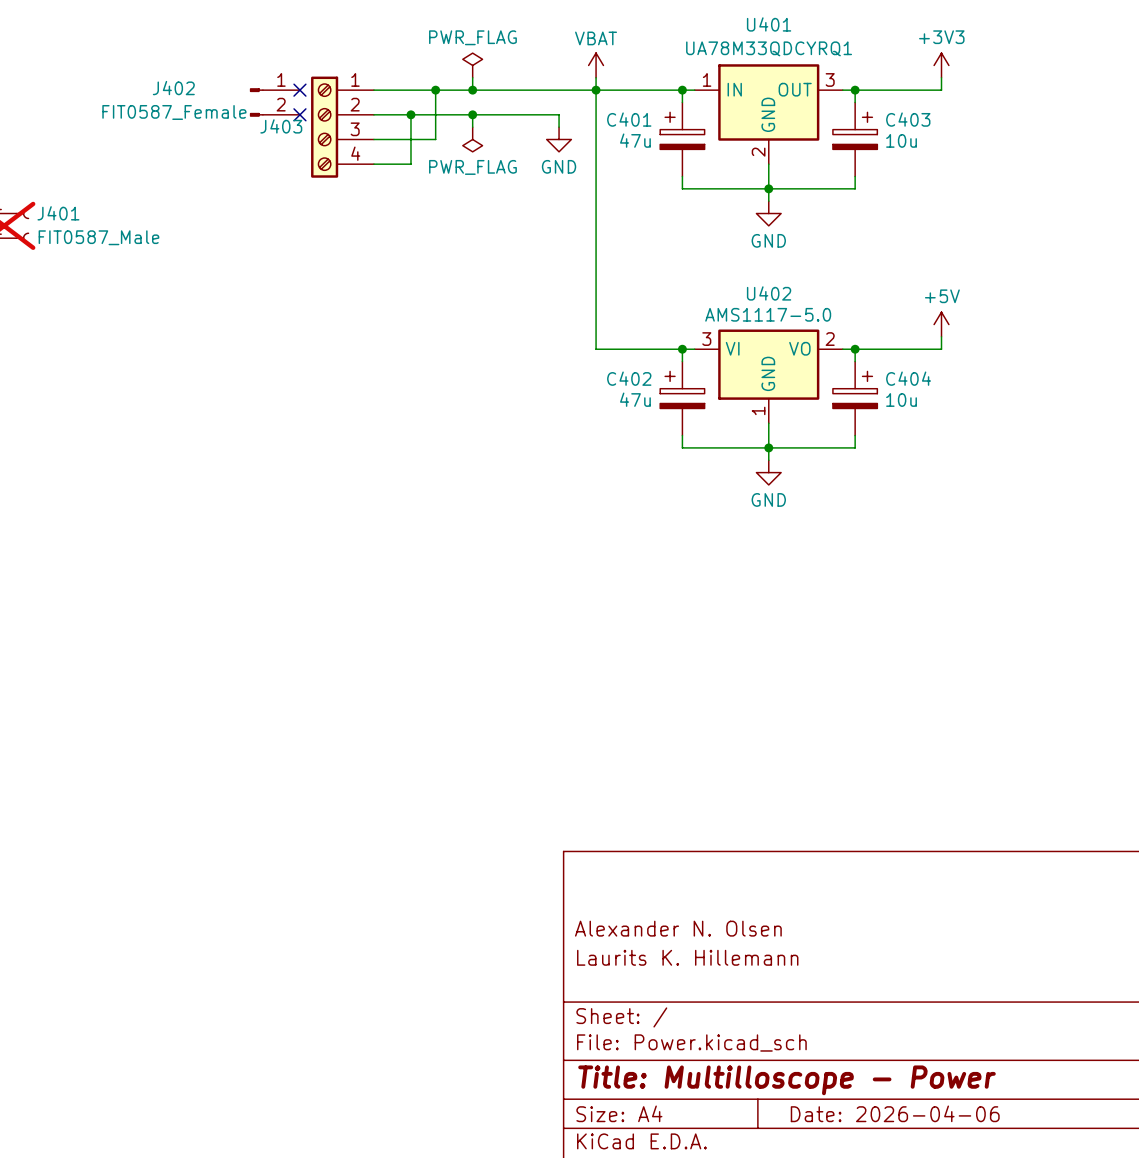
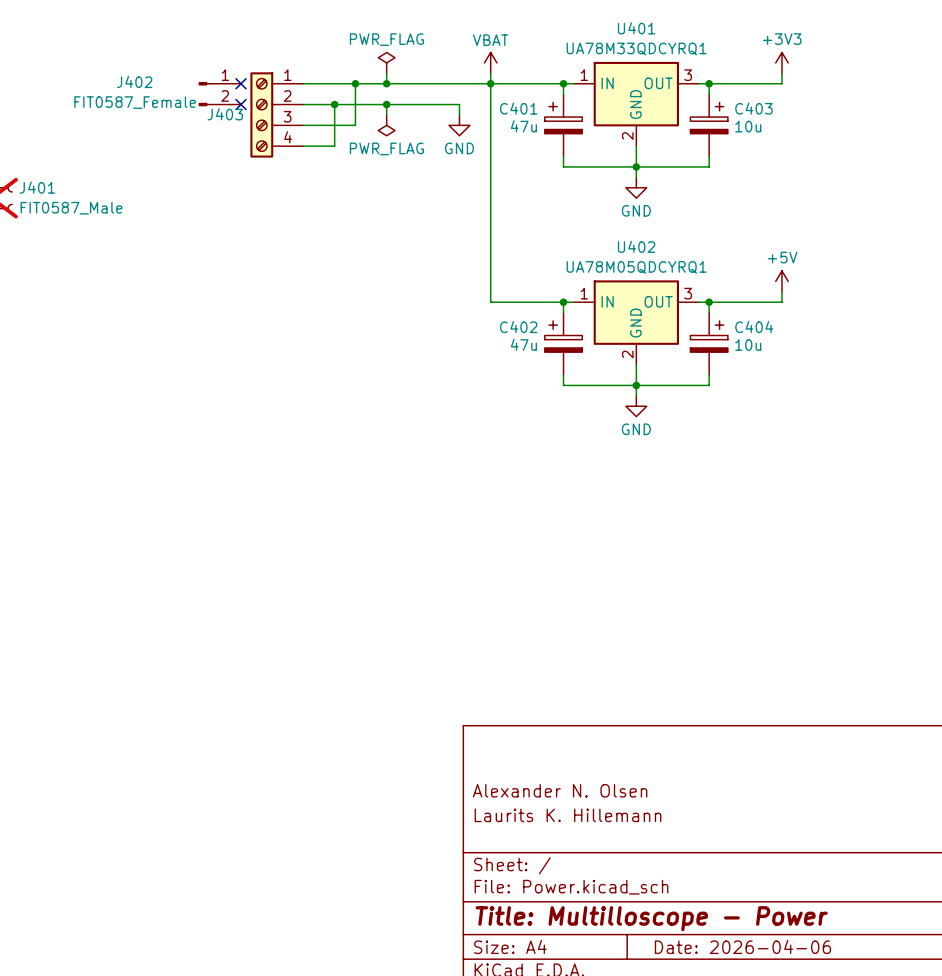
U402 value: AMS1117-5.0 (768, 314) -> UA78M05QDCYRQ1 (636, 267)
U402 symbol: [694, 329, 843, 424] -> [573, 280, 699, 365]

